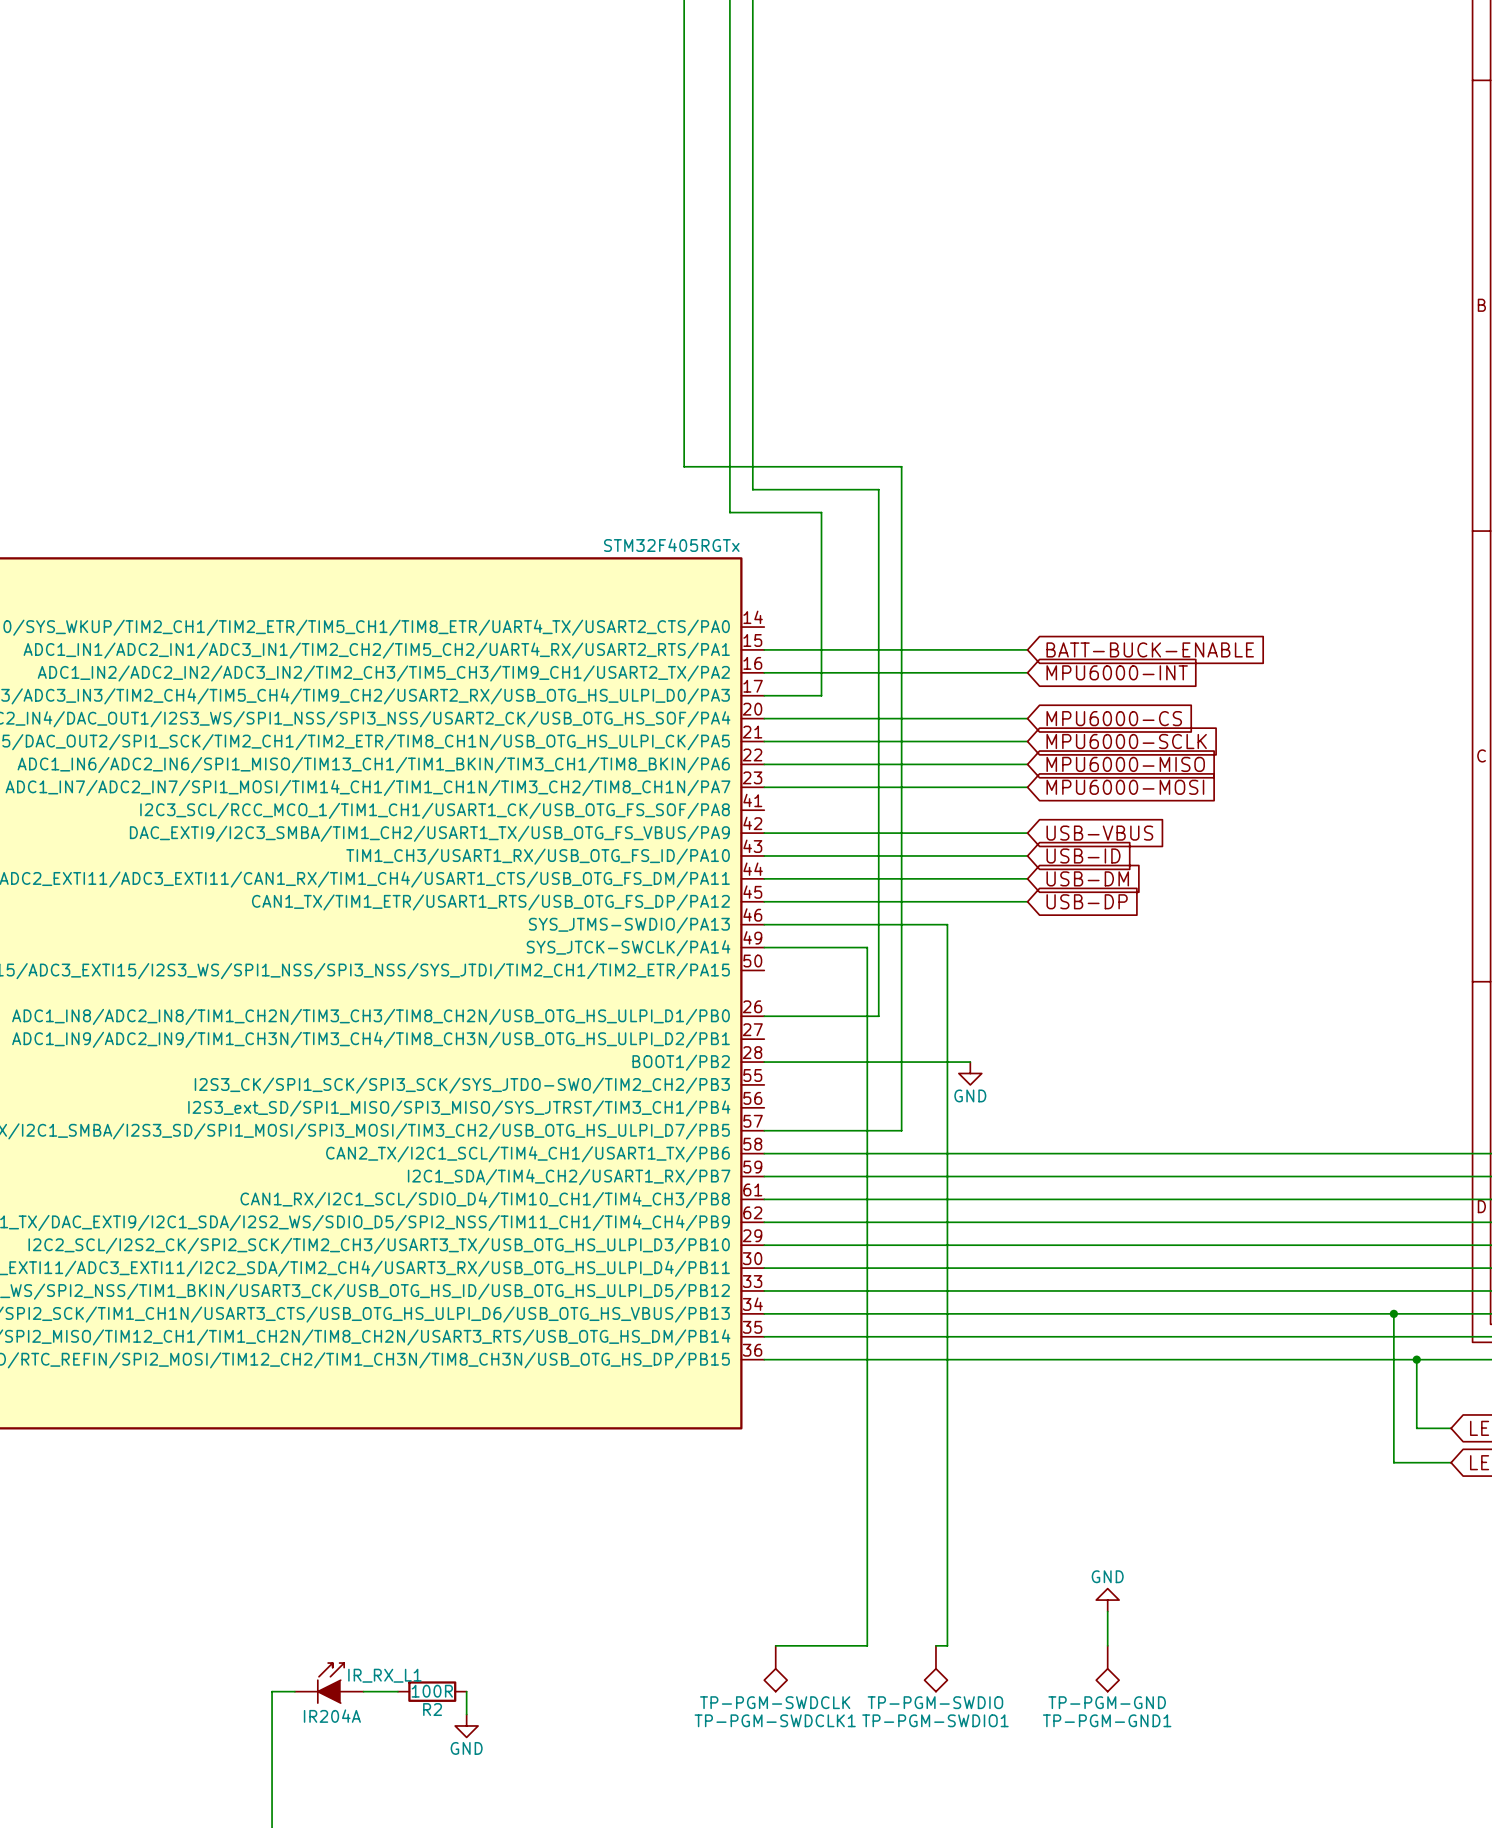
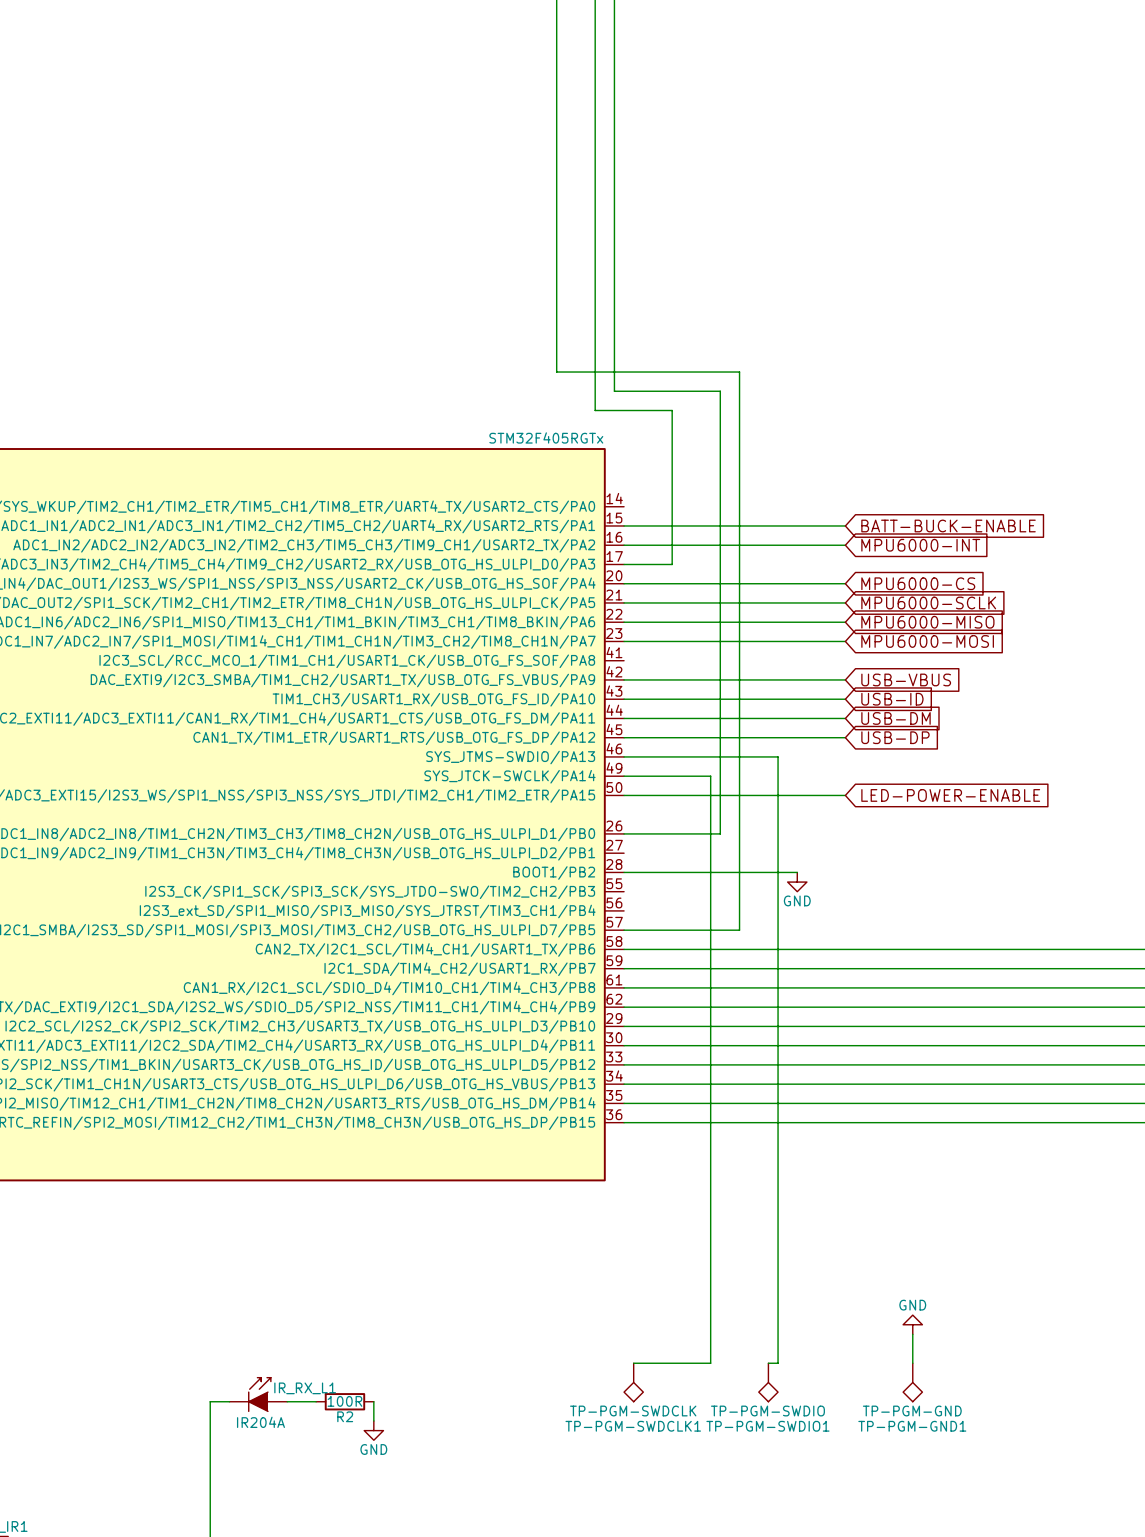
wire: none -> (624, 795) (845, 795)
global label: none -> LED-POWER-ENABLE (950, 795)

